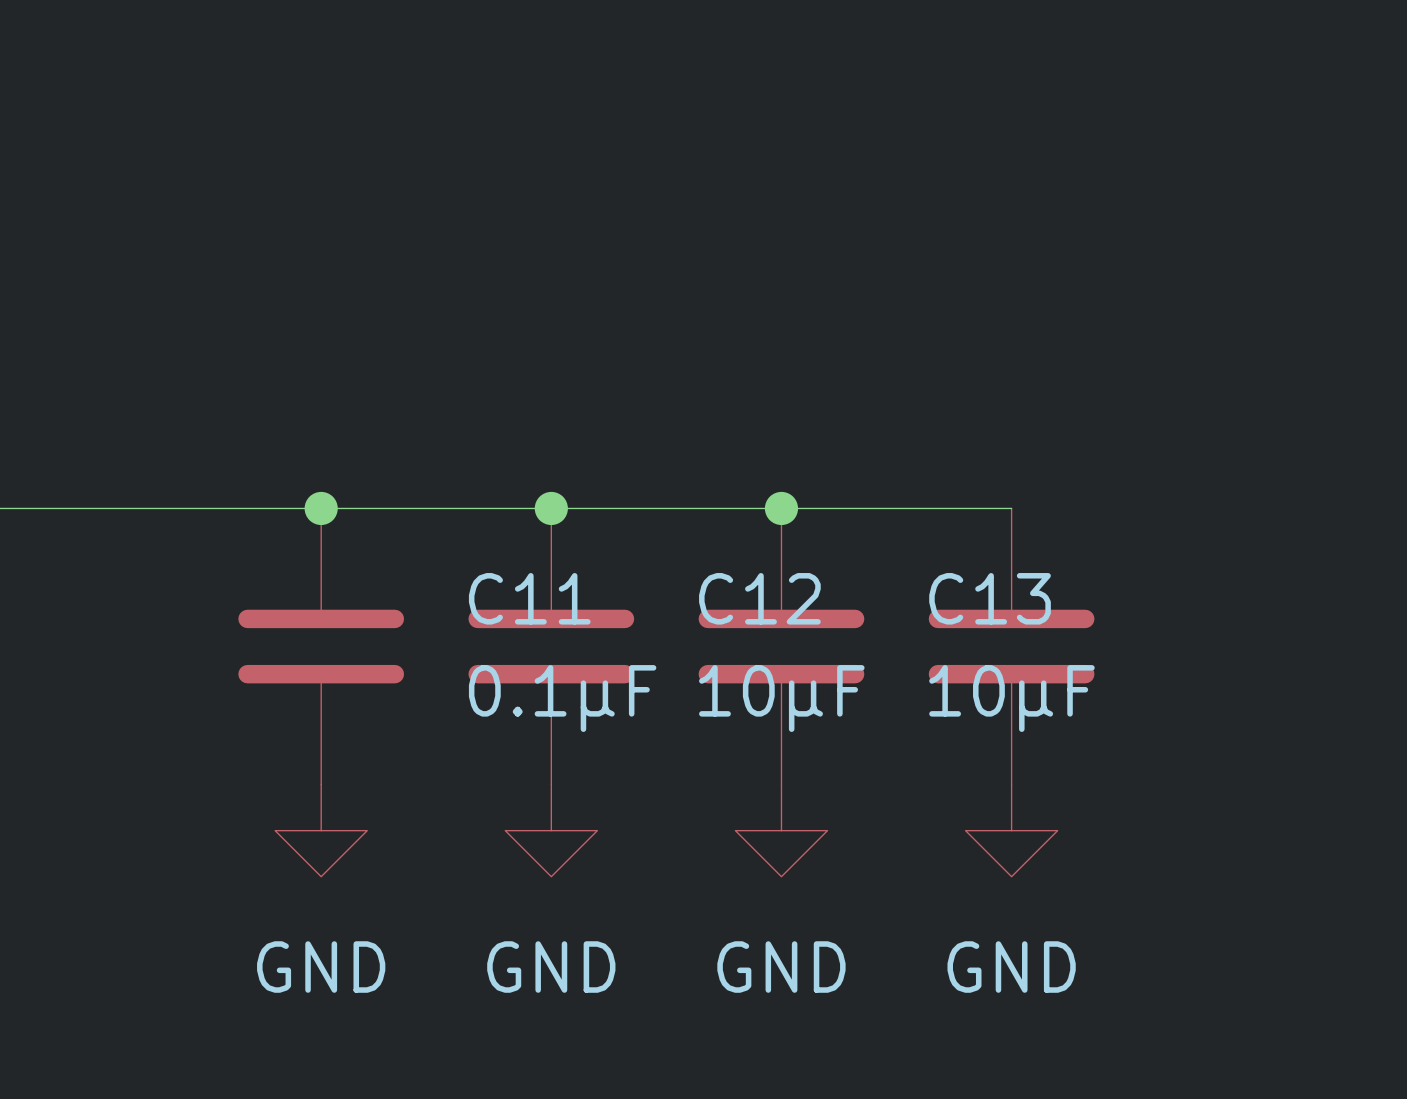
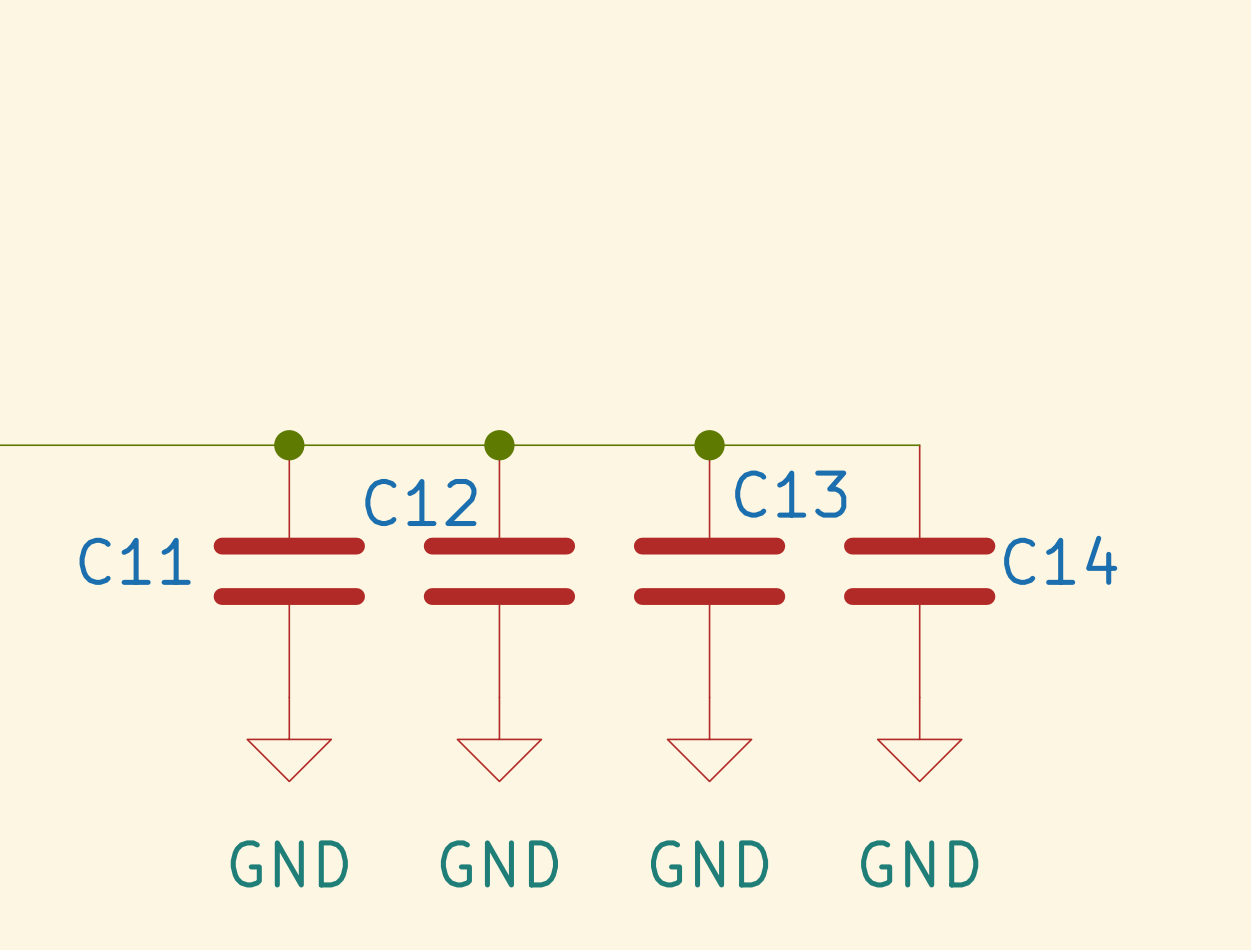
C11 name position: C11 (529, 598) -> C11 (135, 561)
C12 name position: C12 (759, 598) -> C12 (420, 502)
C13 name position: C13 (990, 598) -> C13 (790, 494)
C14 name: none -> C14 (1060, 560)
C11 value: 0.1μF (562, 698) -> none
C12 value: 10μF (781, 698) -> none
C13 value: 10μF (1011, 698) -> none

